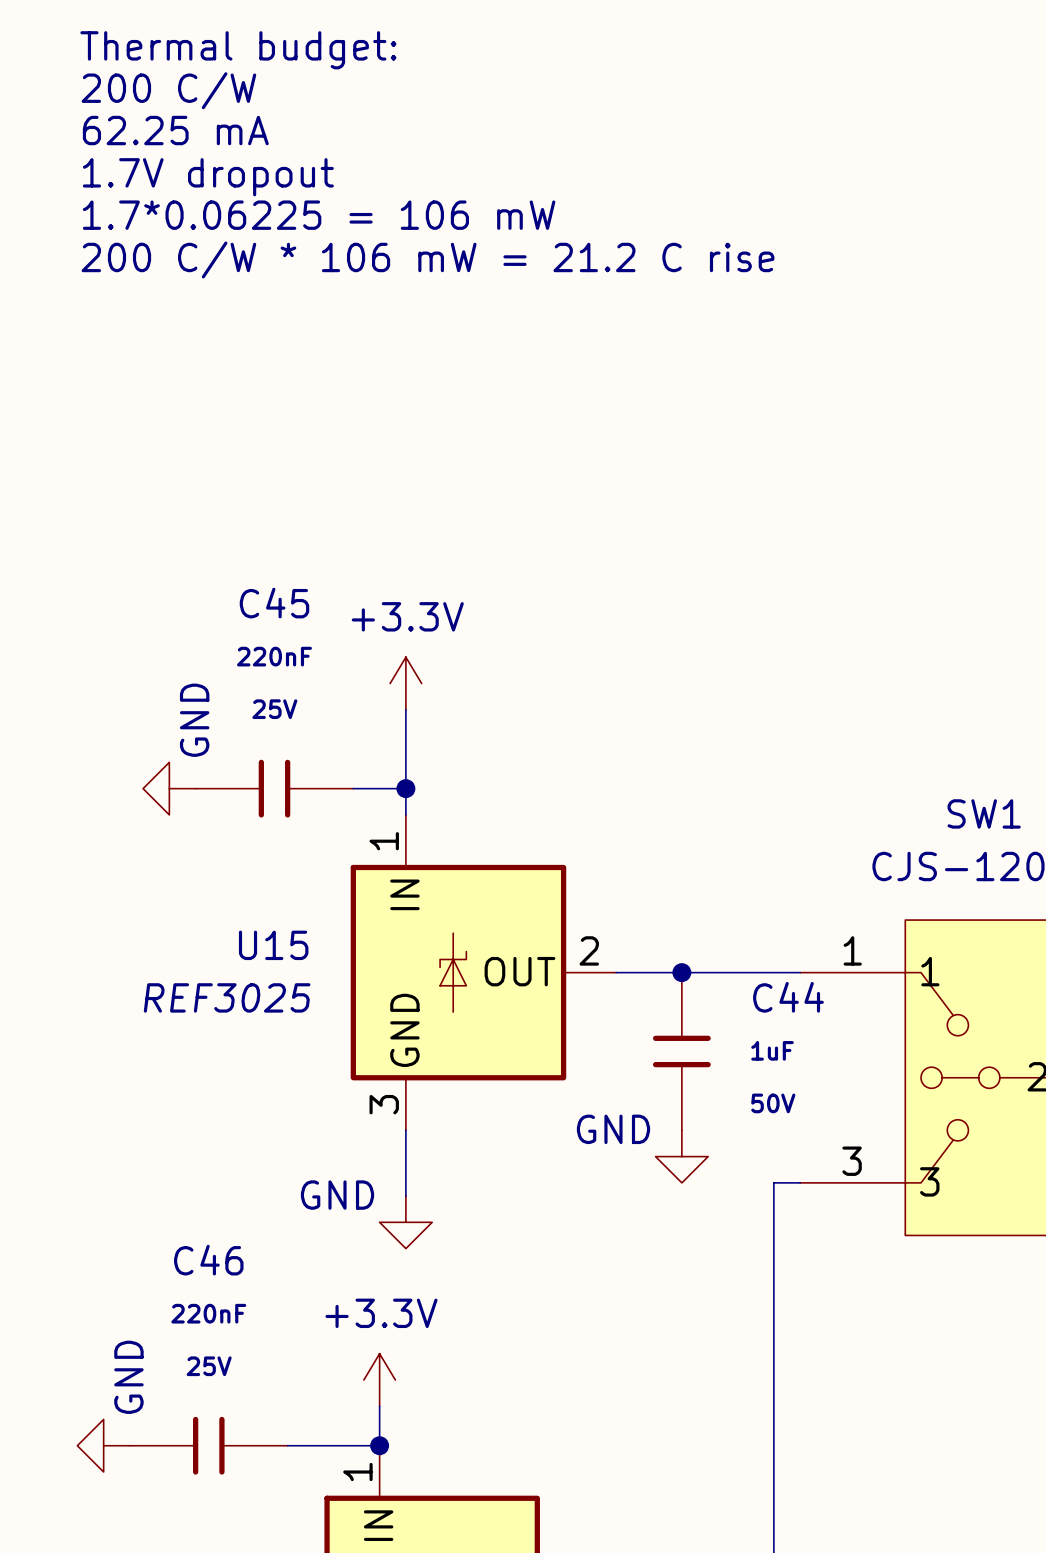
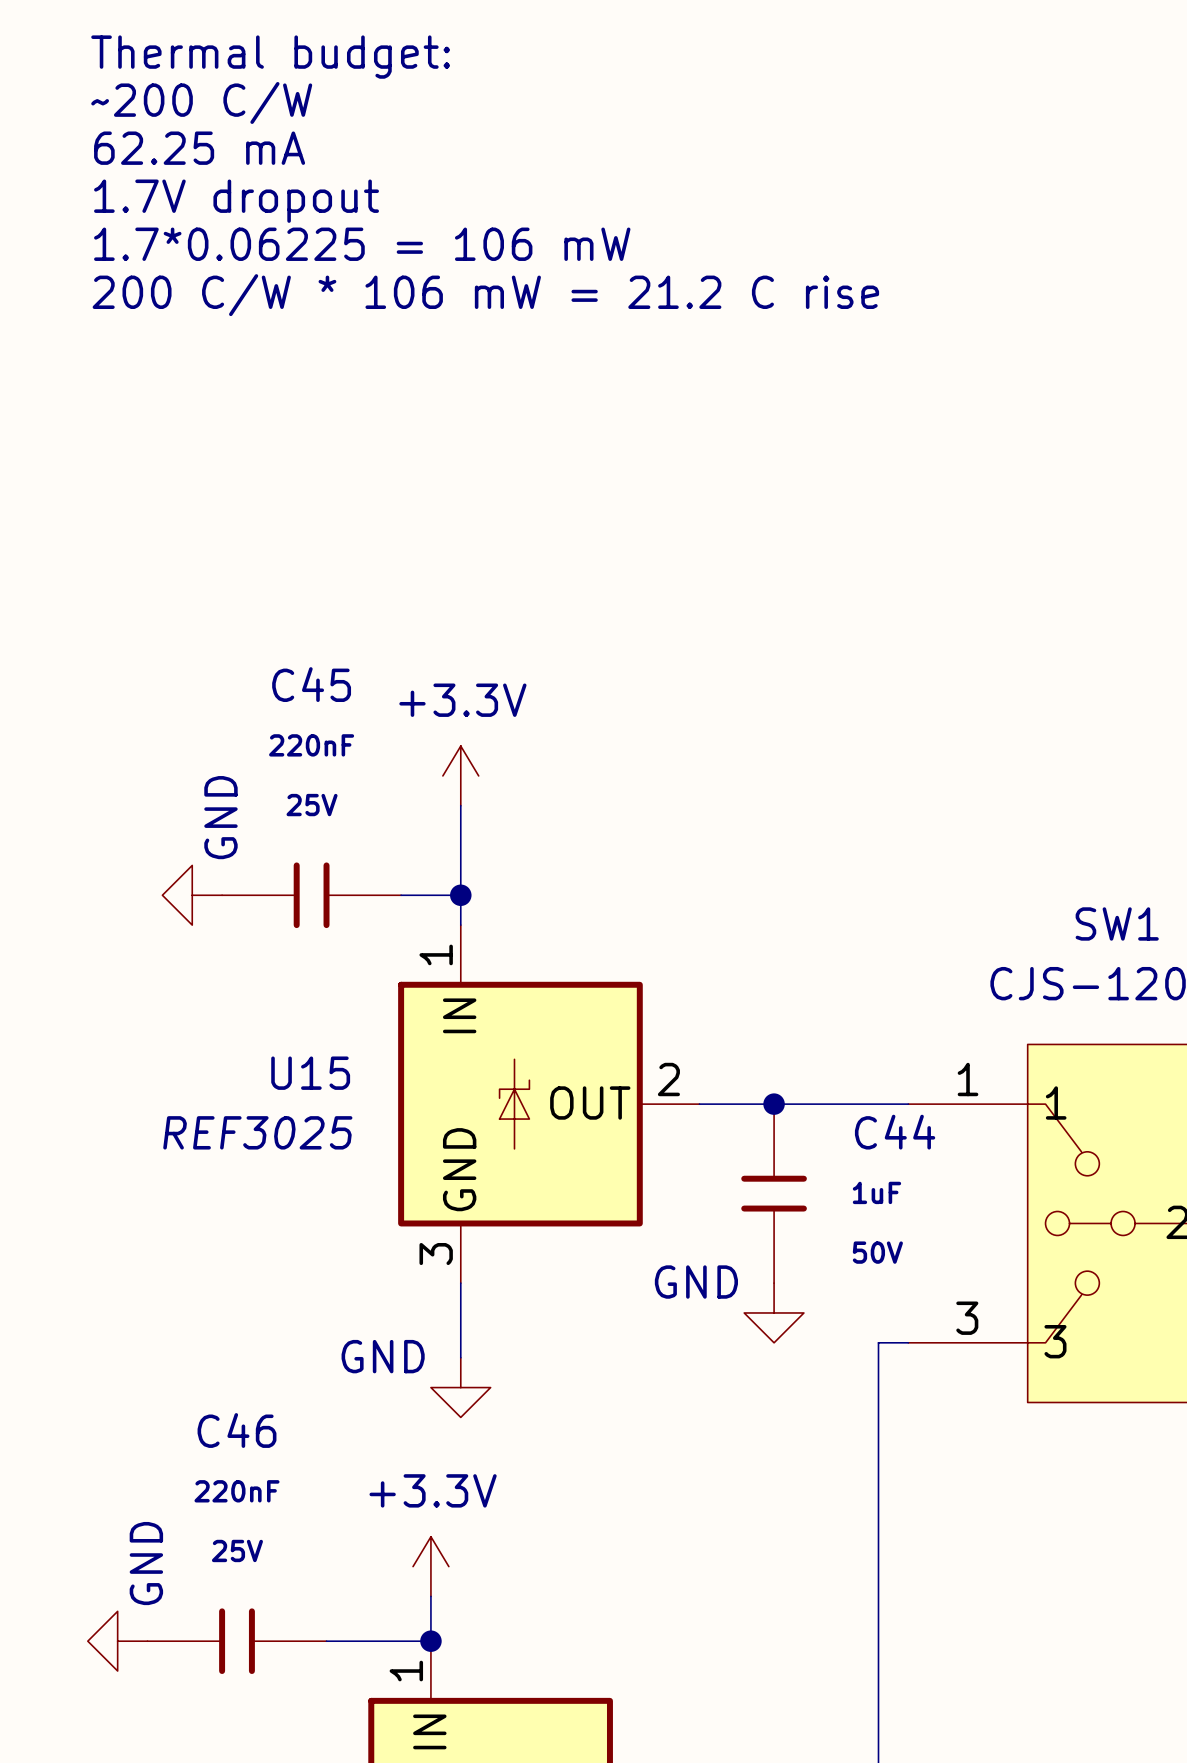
text: 200 C/W (168, 90) -> ~200 C/W (201, 102)

